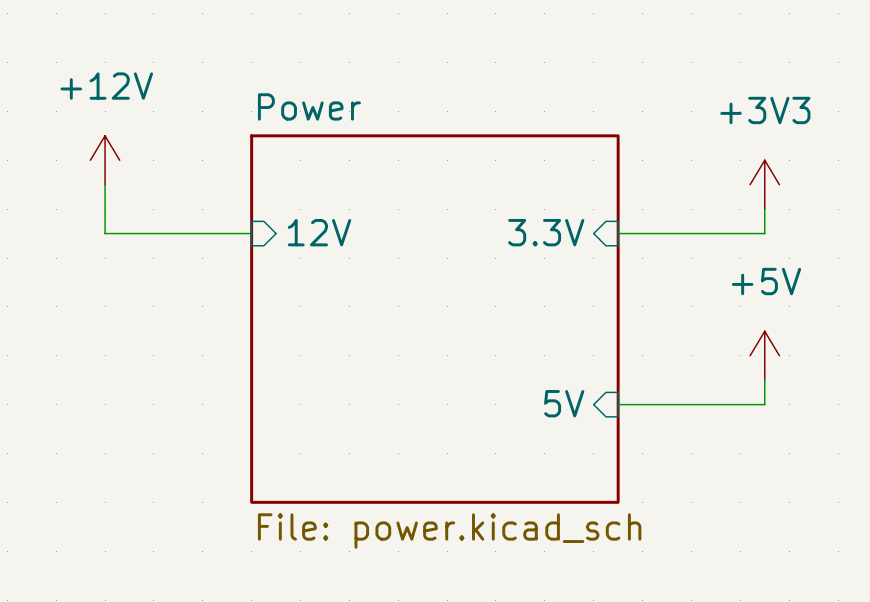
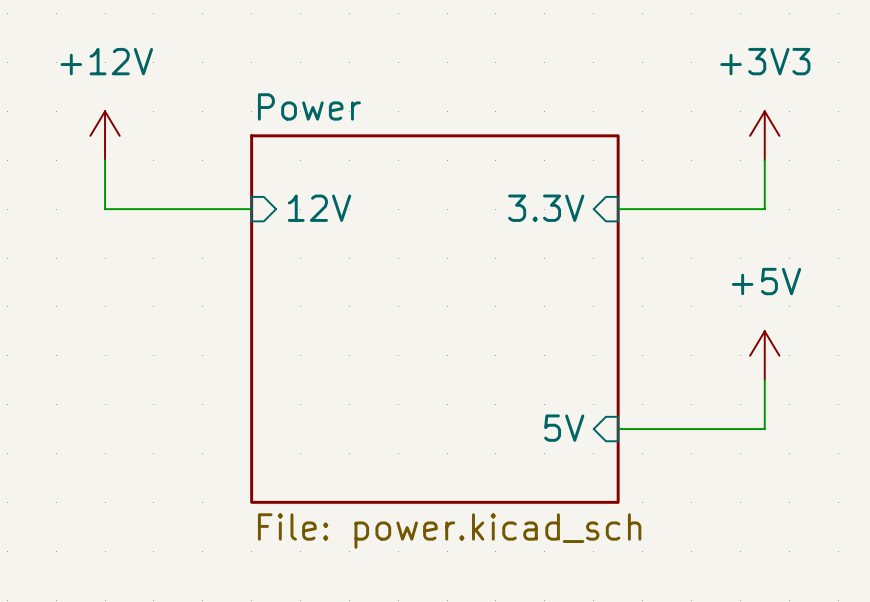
power symbol position: +12V (105, 160) -> +12V (105, 135)
wire: none -> (764, 160) (764, 209) (618, 209)
power symbol position: +3V3 (764, 184) -> +3V3 (764, 135)
wire: (105, 209) (105, 233) (251, 233) -> (105, 209) (251, 209)
wire: (764, 209) (764, 233) (618, 233) -> none
sheet pin position: 12V (319, 232) -> 12V (319, 208)
sheet pin position: 3.3V (546, 232) -> 3.3V (546, 208)
sheet pin position: 5V (564, 403) -> 5V (564, 428)
wire: (618, 404) (764, 404) -> (618, 429) (764, 429) (764, 404)

